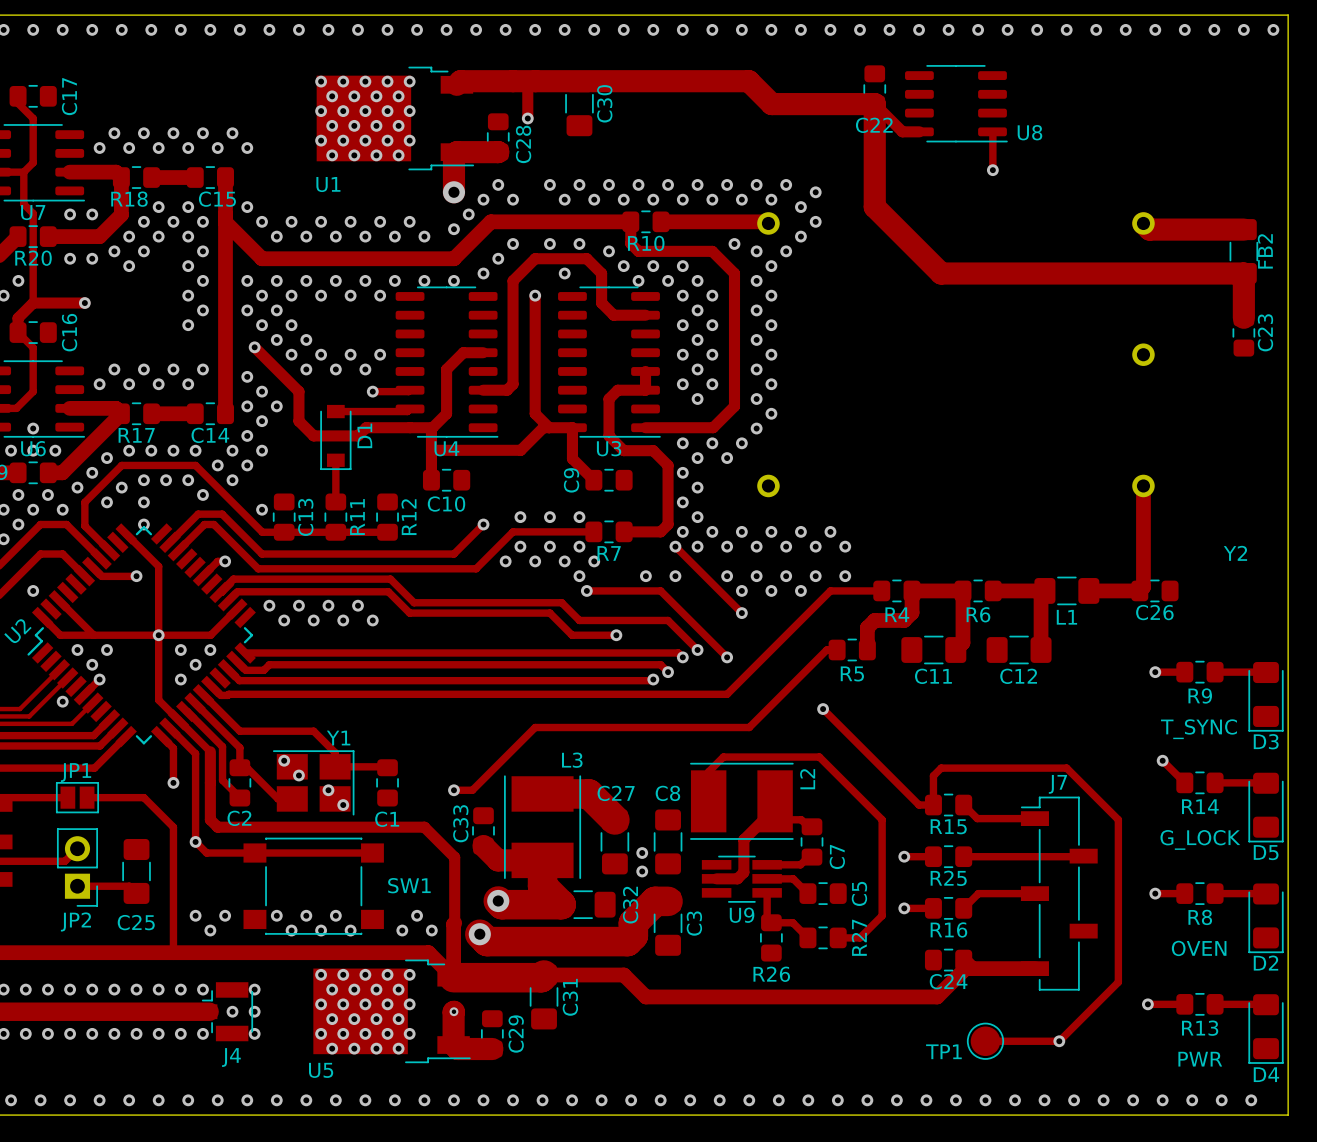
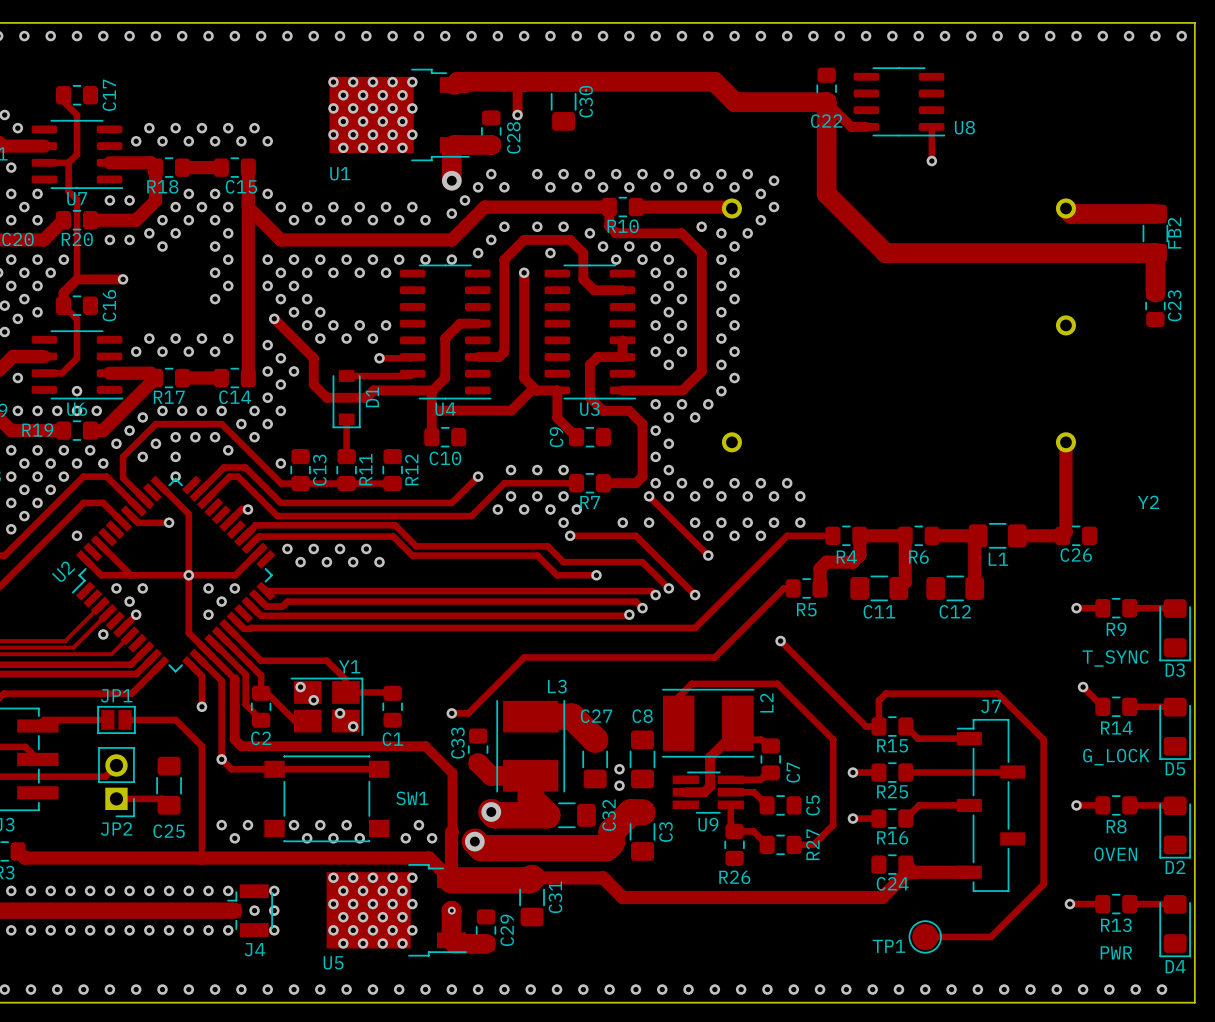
via: (1059, 1041) -> none

